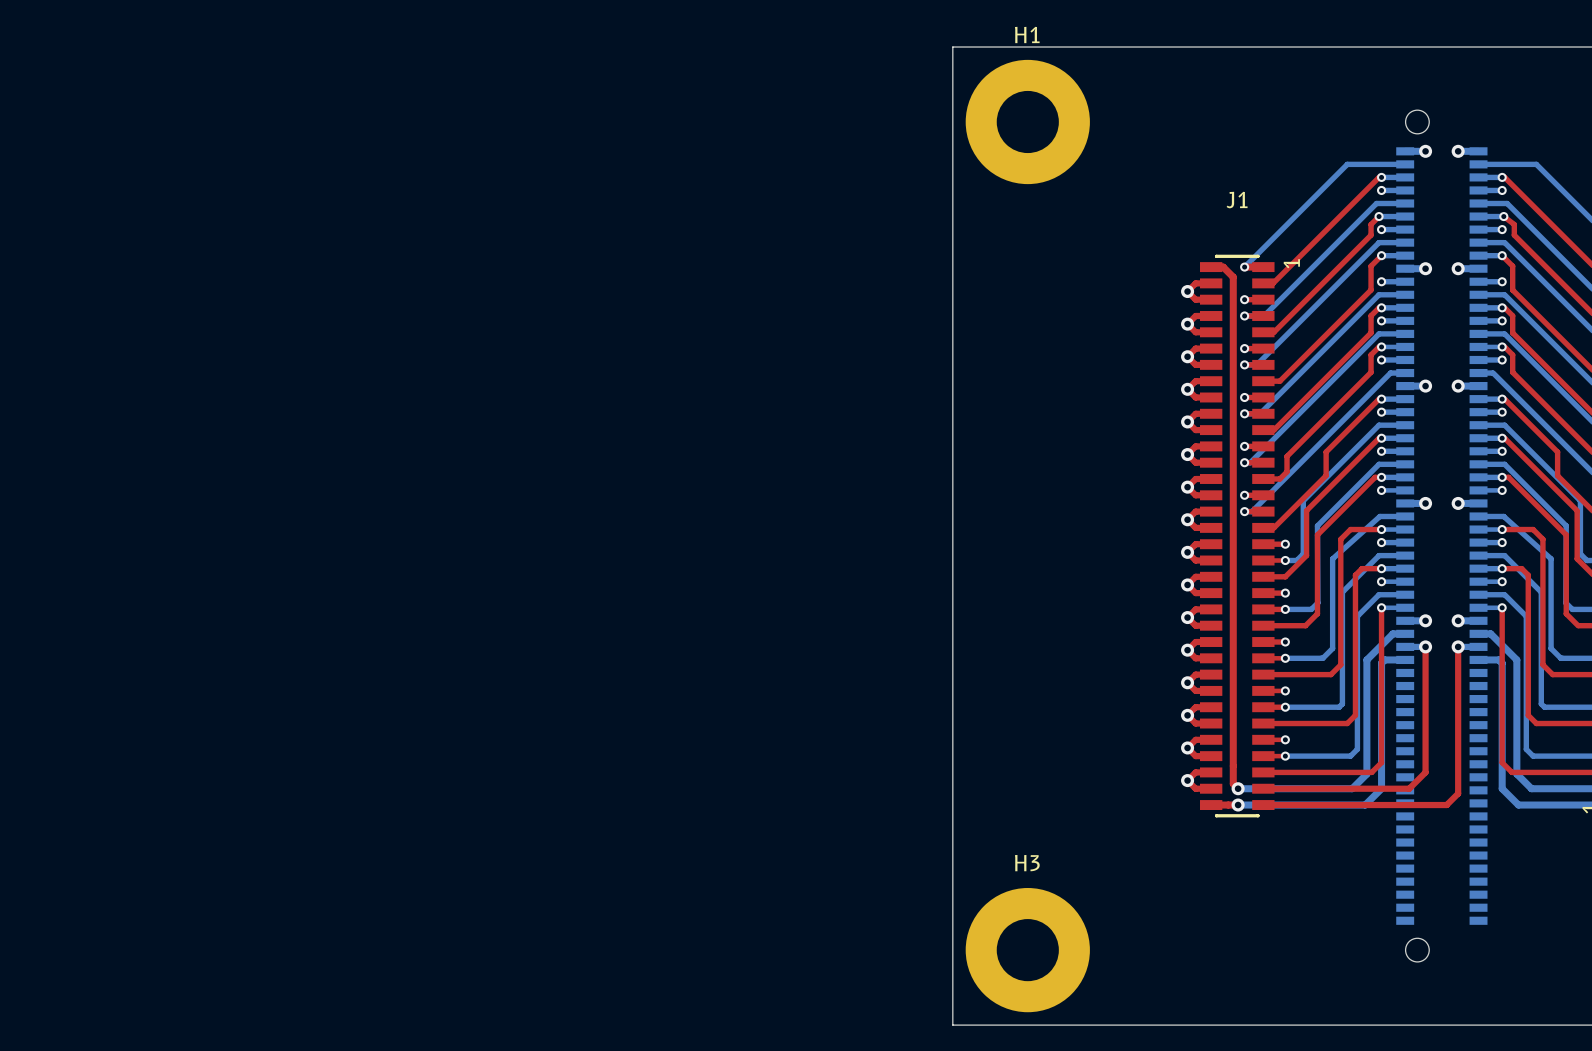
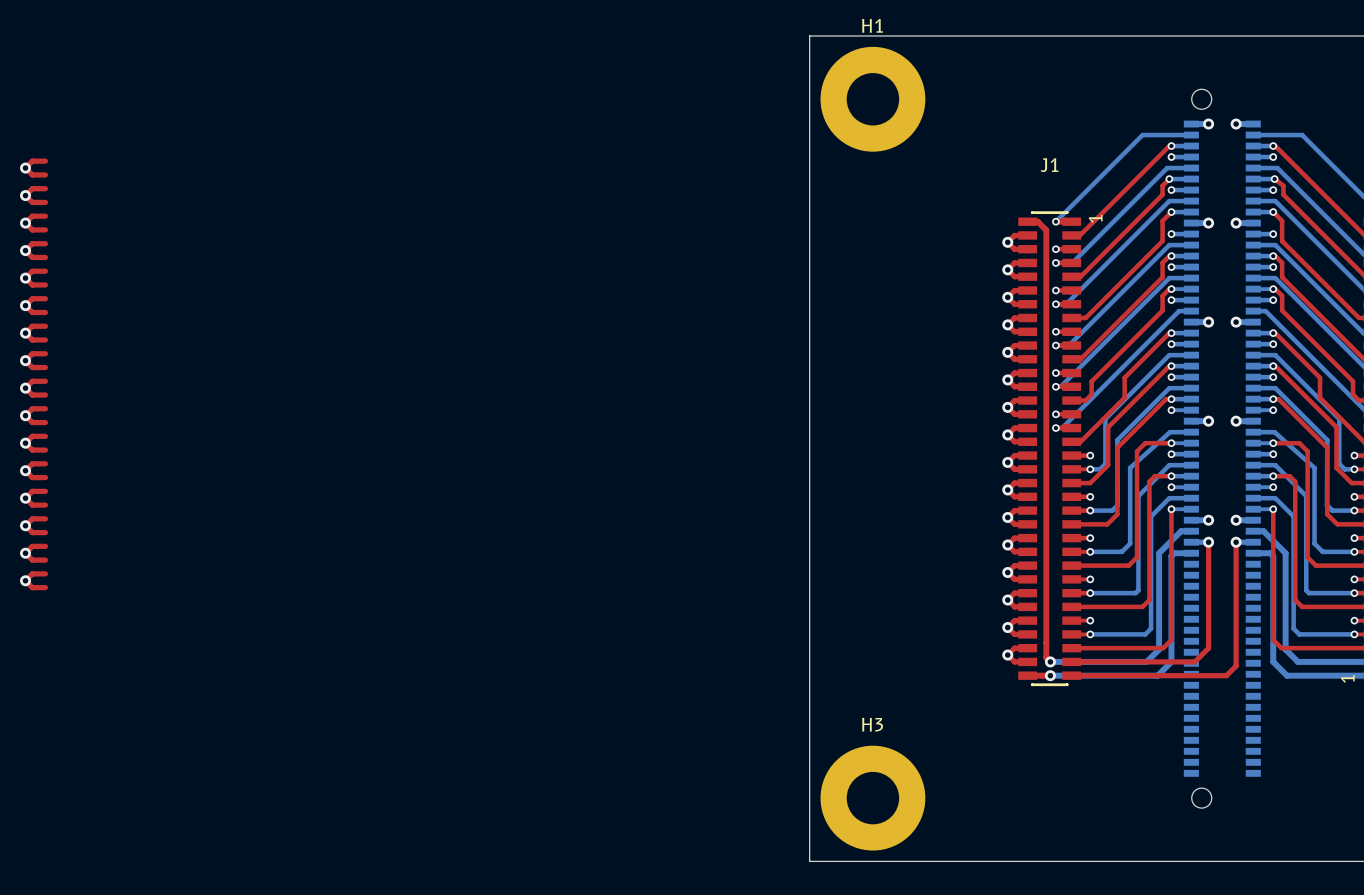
top track: none -> (45, 161) (32, 161) (25, 168) (32, 174) (45, 174)
via: none -> (25, 168)
top track: none -> (45, 188) (32, 188) (25, 195) (32, 202) (45, 202)
via: none -> (25, 195)
top track: none -> (45, 216) (32, 216) (25, 223) (32, 229) (45, 229)
via: none -> (25, 223)
top track: none -> (45, 243) (32, 243) (25, 250) (32, 257) (45, 257)
via: none -> (25, 250)
top track: none -> (45, 271) (32, 271) (25, 278) (32, 284) (45, 284)
via: none -> (25, 278)
top track: none -> (45, 298) (32, 298) (25, 305) (32, 312) (45, 312)
via: none -> (25, 305)
top track: none -> (45, 326) (32, 326) (25, 333) (32, 340) (45, 340)
via: none -> (25, 333)
top track: none -> (45, 353) (32, 353) (25, 360) (32, 367) (45, 367)
via: none -> (25, 360)
top track: none -> (45, 381) (32, 381) (25, 388) (32, 395) (45, 395)
via: none -> (25, 388)
top track: none -> (45, 408) (32, 408) (25, 415) (32, 422) (45, 422)
via: none -> (25, 415)
top track: none -> (45, 436) (32, 436) (25, 443) (32, 450) (45, 450)
via: none -> (25, 443)
top track: none -> (45, 463) (32, 463) (25, 470) (32, 477) (45, 477)
via: none -> (25, 470)
top track: none -> (45, 491) (32, 491) (25, 498) (32, 505) (45, 505)
via: none -> (25, 498)
top track: none -> (45, 518) (32, 518) (25, 525) (32, 532) (45, 532)
via: none -> (25, 525)
top track: none -> (45, 546) (32, 546) (25, 553) (32, 560) (45, 560)
via: none -> (25, 553)
top track: none -> (45, 573) (32, 573) (25, 580) (32, 587) (45, 587)
via: none -> (25, 580)

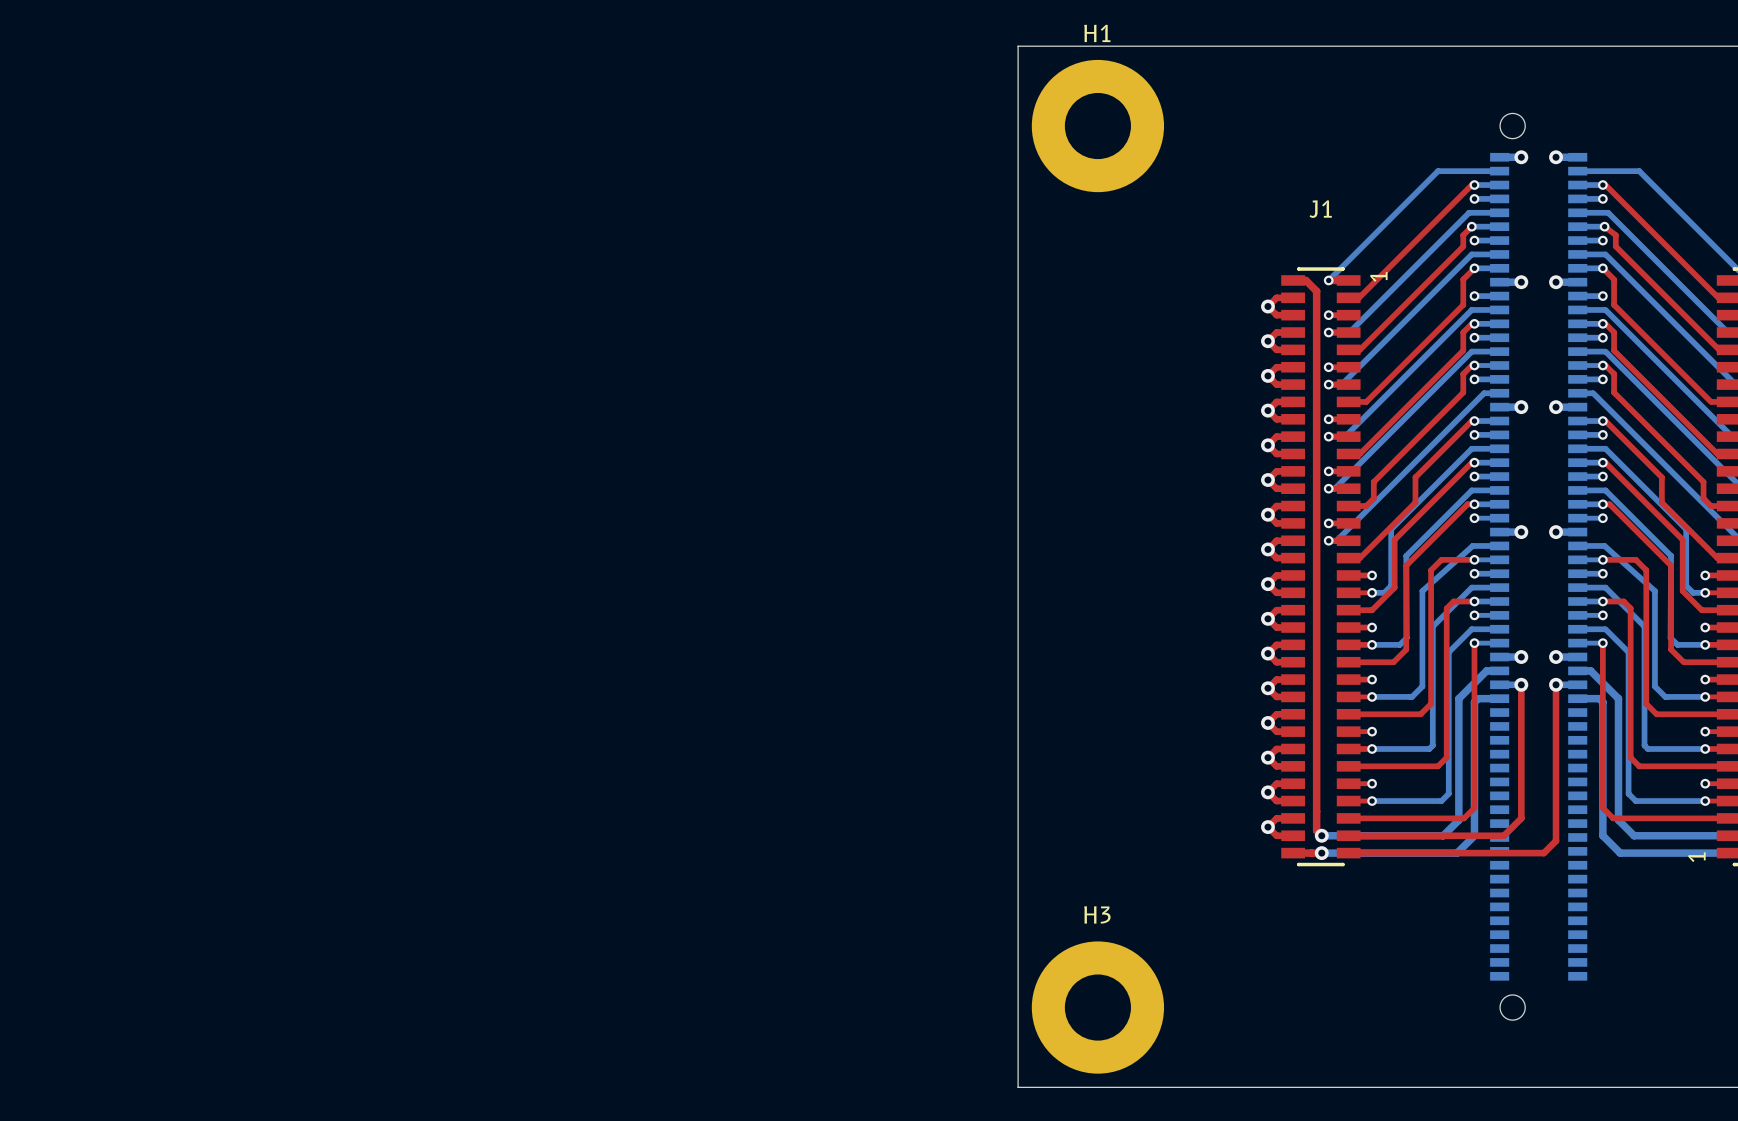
top track: (45, 161) (32, 161) (25, 168) (32, 174) (45, 174) -> none
via: (25, 168) -> none
top track: (45, 188) (32, 188) (25, 195) (32, 202) (45, 202) -> none
via: (25, 195) -> none
top track: (45, 216) (32, 216) (25, 223) (32, 229) (45, 229) -> none
via: (25, 223) -> none
top track: (45, 243) (32, 243) (25, 250) (32, 257) (45, 257) -> none
via: (25, 250) -> none
top track: (45, 271) (32, 271) (25, 278) (32, 284) (45, 284) -> none
via: (25, 278) -> none
top track: (45, 298) (32, 298) (25, 305) (32, 312) (45, 312) -> none
via: (25, 305) -> none
top track: (45, 326) (32, 326) (25, 333) (32, 340) (45, 340) -> none
via: (25, 333) -> none
top track: (45, 353) (32, 353) (25, 360) (32, 367) (45, 367) -> none
via: (25, 360) -> none
top track: (45, 381) (32, 381) (25, 388) (32, 395) (45, 395) -> none
via: (25, 388) -> none
top track: (45, 408) (32, 408) (25, 415) (32, 422) (45, 422) -> none
via: (25, 415) -> none
top track: (45, 436) (32, 436) (25, 443) (32, 450) (45, 450) -> none
via: (25, 443) -> none
top track: (45, 463) (32, 463) (25, 470) (32, 477) (45, 477) -> none
via: (25, 470) -> none
top track: (45, 491) (32, 491) (25, 498) (32, 505) (45, 505) -> none
via: (25, 498) -> none
top track: (45, 518) (32, 518) (25, 525) (32, 532) (45, 532) -> none
via: (25, 525) -> none
top track: (45, 546) (32, 546) (25, 553) (32, 560) (45, 560) -> none
via: (25, 553) -> none
top track: (45, 573) (32, 573) (25, 580) (32, 587) (45, 587) -> none
via: (25, 580) -> none

